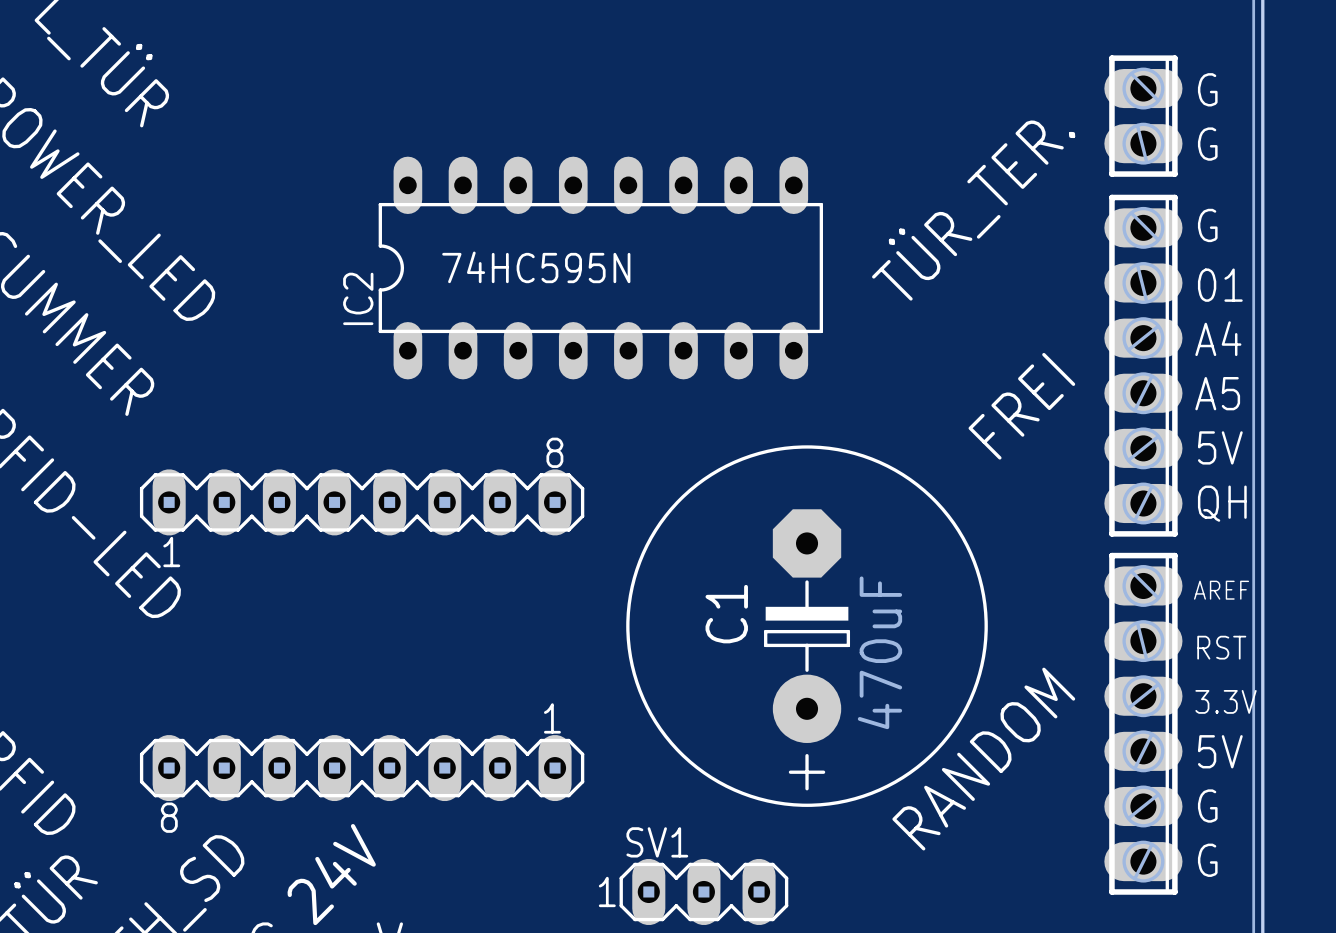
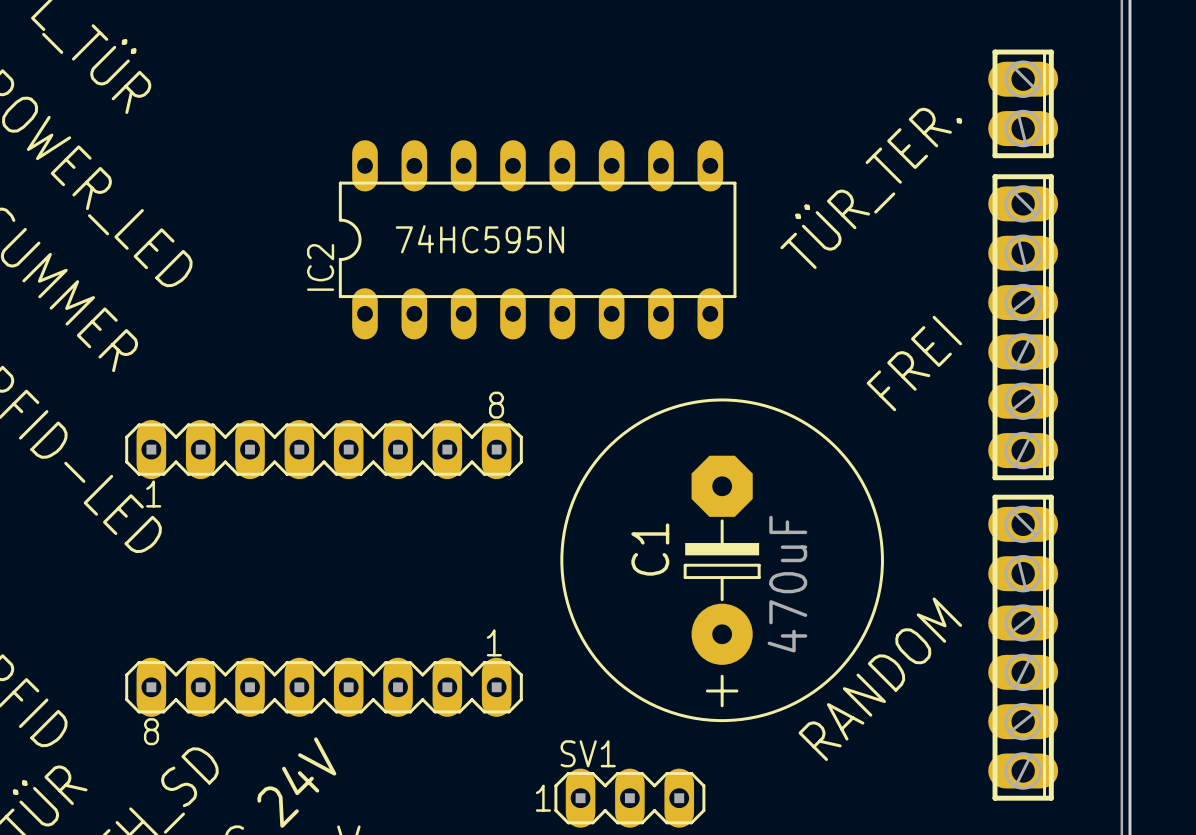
text: G (1207, 89) -> none
text: G (1207, 144) -> none
text: G (1207, 225) -> none
text: 01 (1220, 285) -> none
text: A4 (1218, 338) -> none
text: A5 (1217, 393) -> none
text: 5V (1220, 447) -> none
text: QH (1222, 503) -> none
text: AREF (1221, 590) -> none
text: RST (1221, 647) -> none
text: 3.3V (1226, 701) -> none
text: 5V (1220, 751) -> none
text: G (1207, 806) -> none
text: G (1207, 860) -> none

